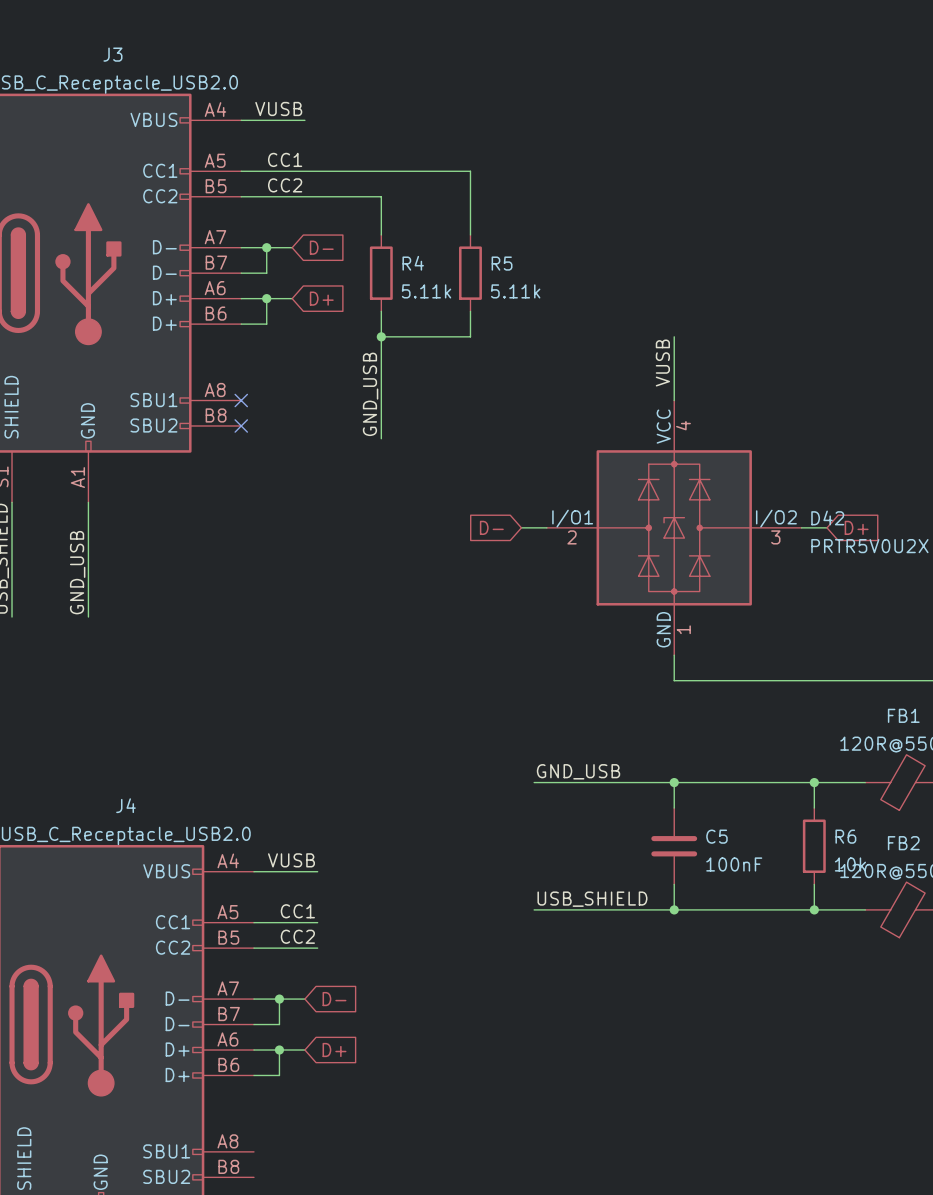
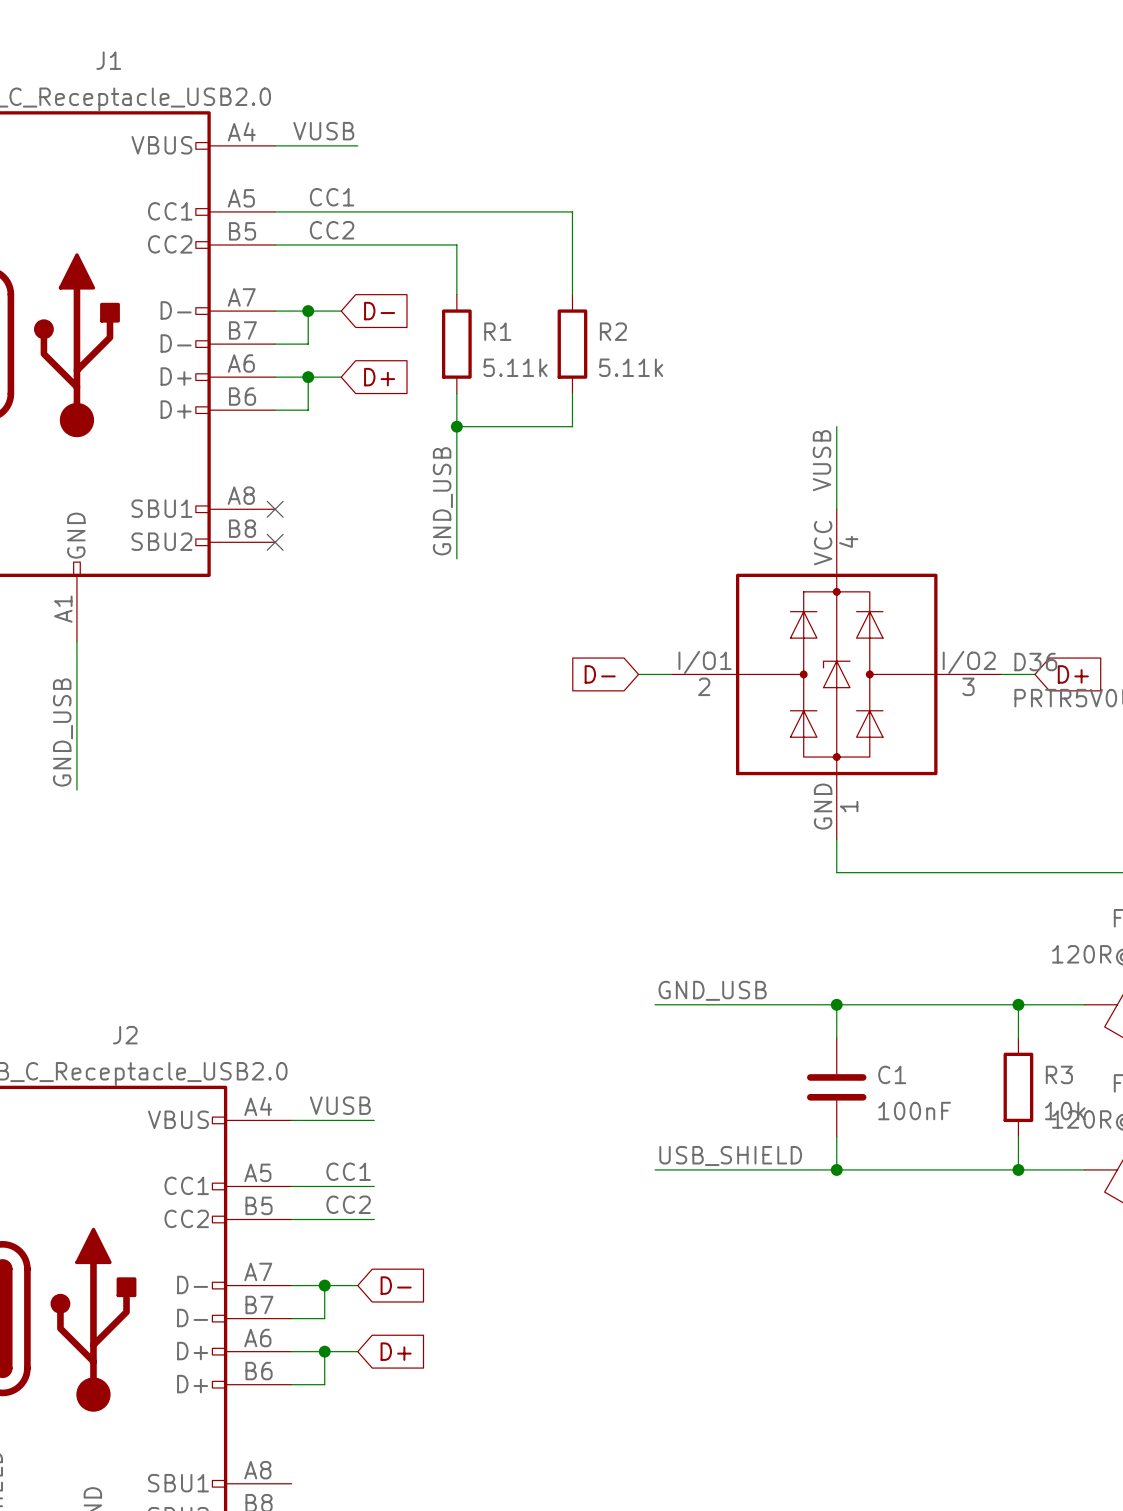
J3 name: J3 (112, 54) -> J1 (108, 60)
R4 name: R4 (413, 263) -> R1 (497, 331)
R5 name: R5 (502, 263) -> R2 (613, 331)
D42 name: D42 (827, 517) -> D36 (1035, 662)
J4 name: J4 (125, 805) -> J2 (125, 1035)
C5 name: C5 (716, 836) -> C1 (892, 1074)
R6 name: R6 (845, 836) -> R3 (1059, 1074)

